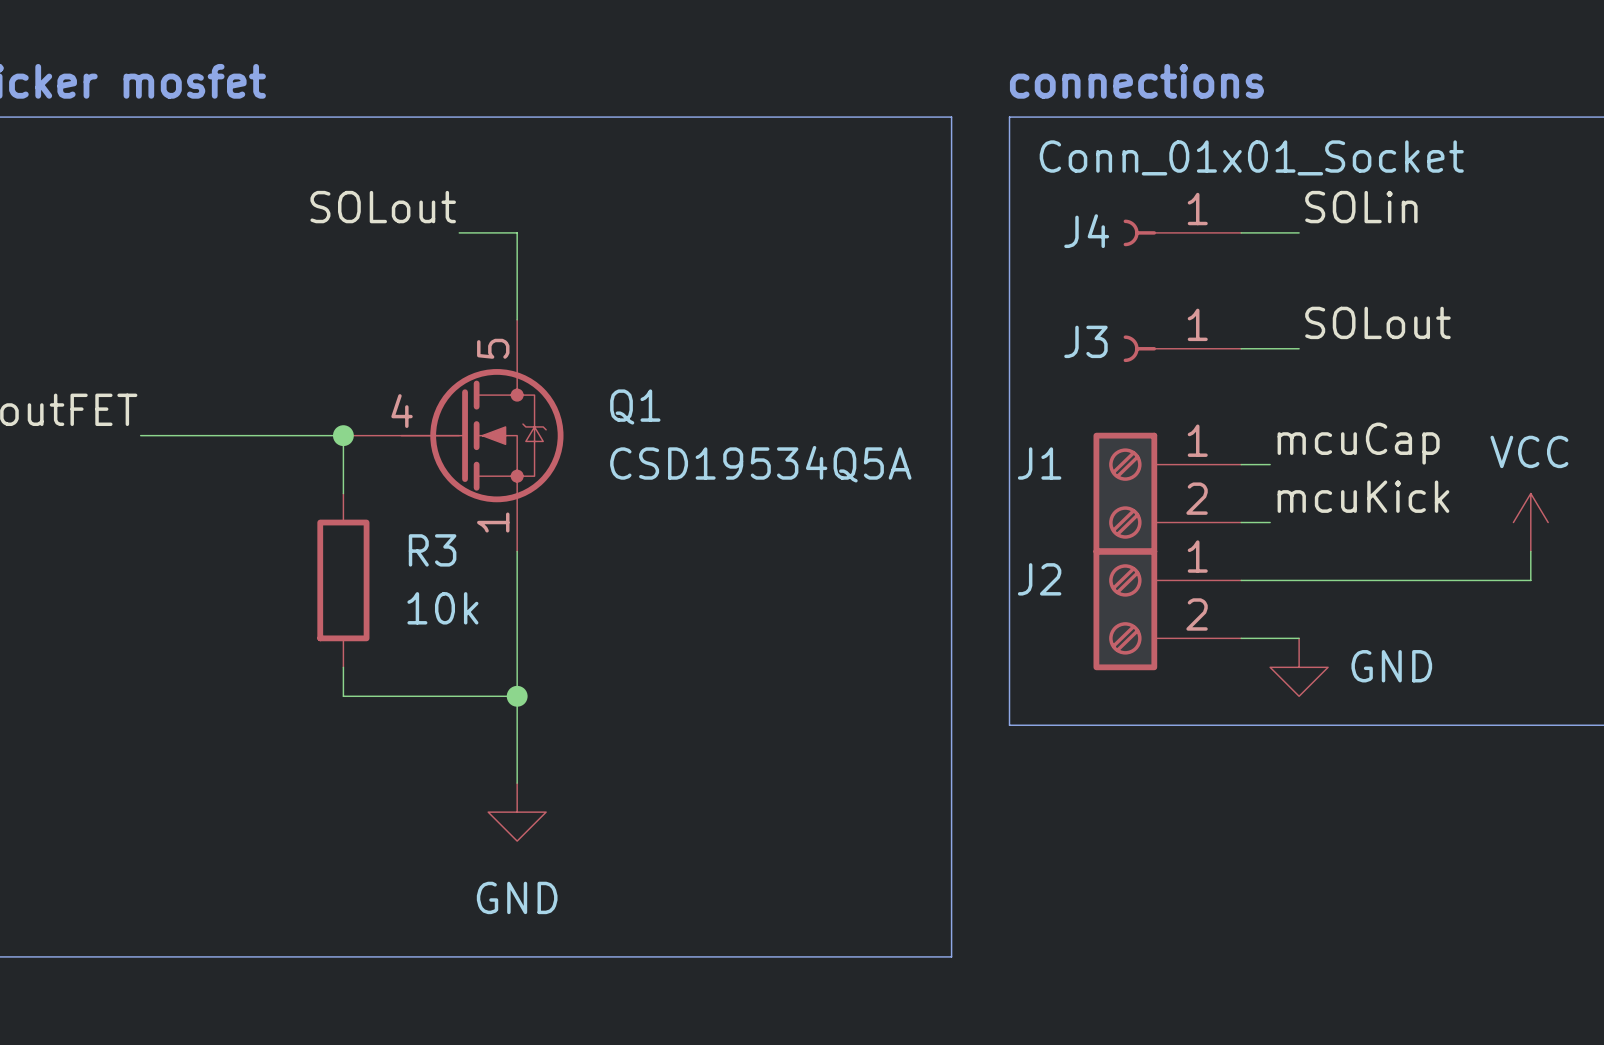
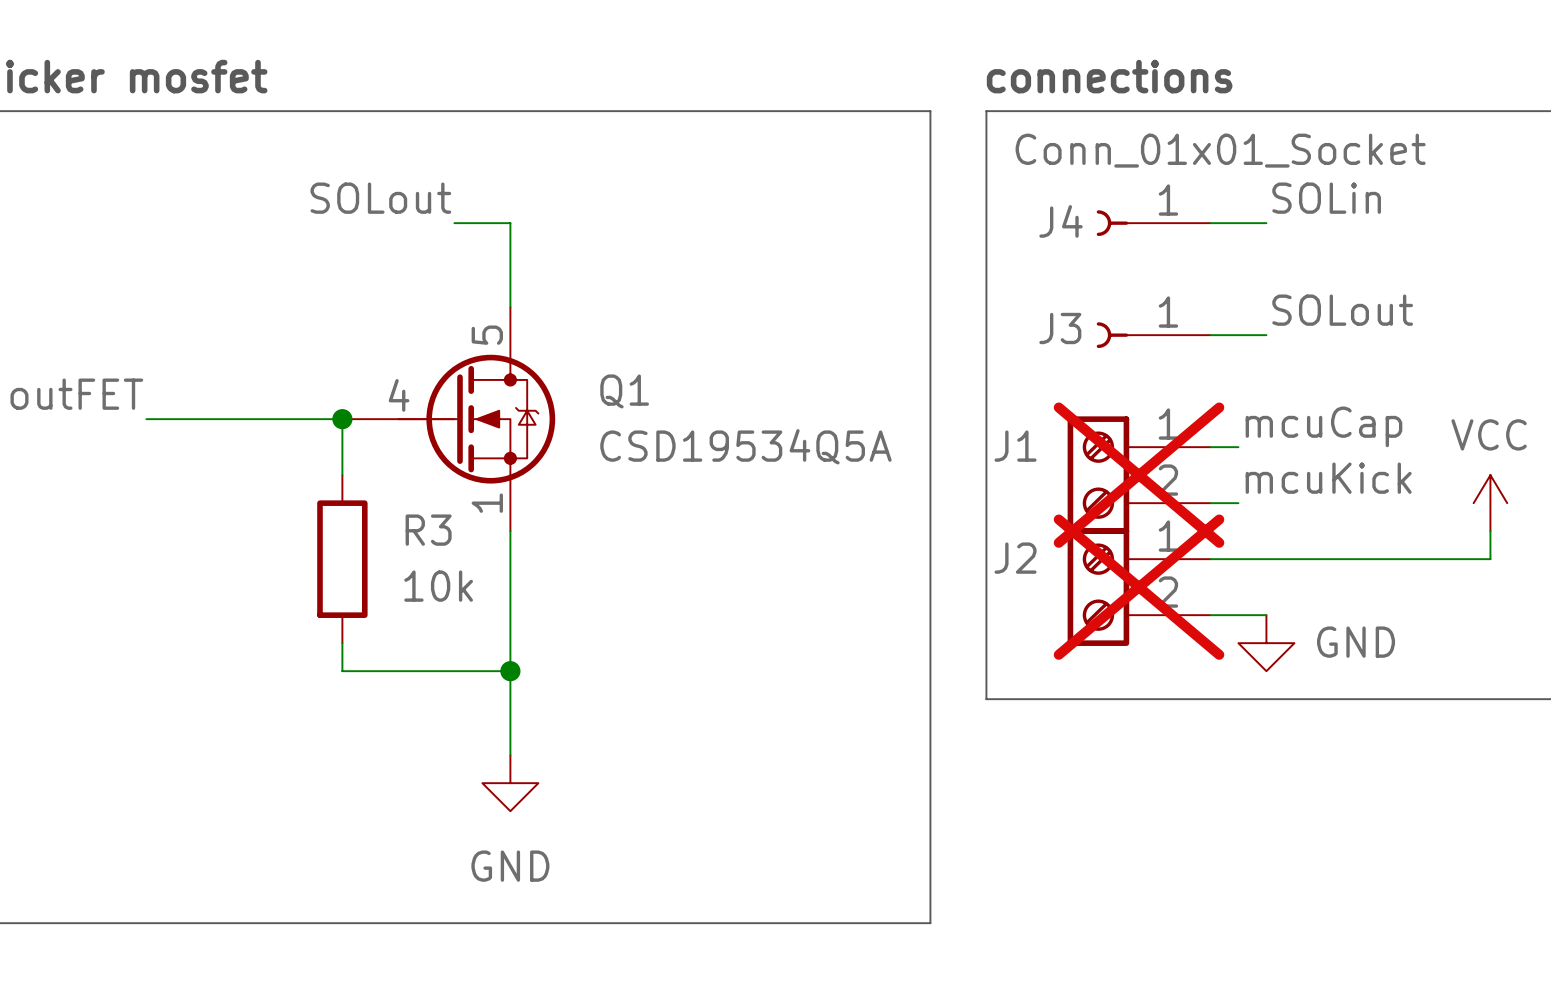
J1 do-not-place cross: none -> (1139, 475)
J2 do-not-place cross: none -> (1139, 587)

